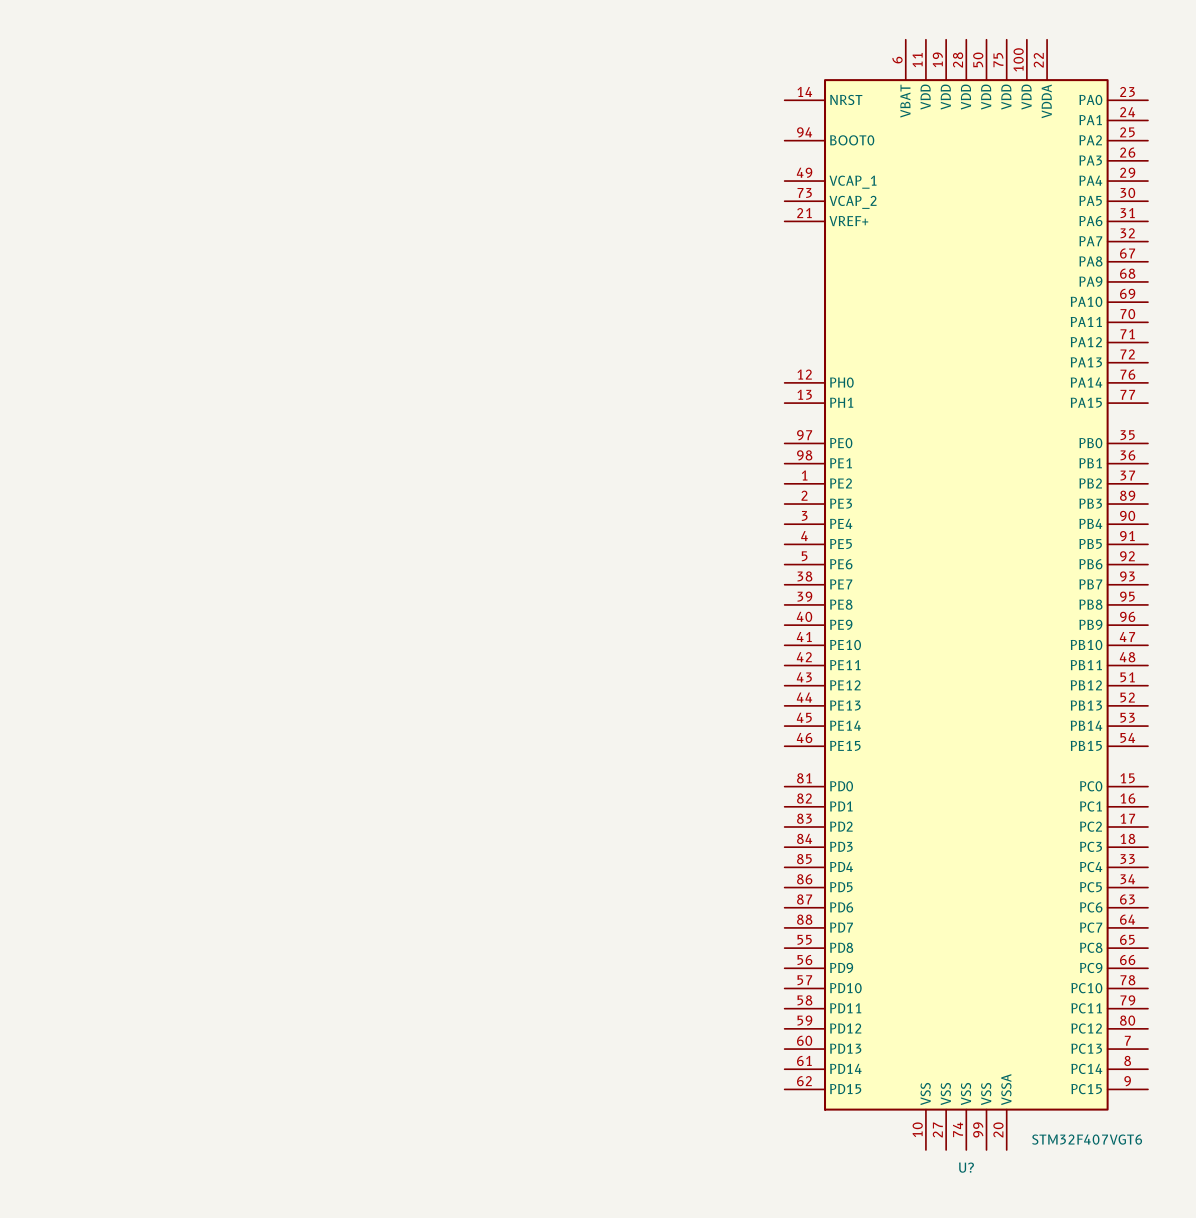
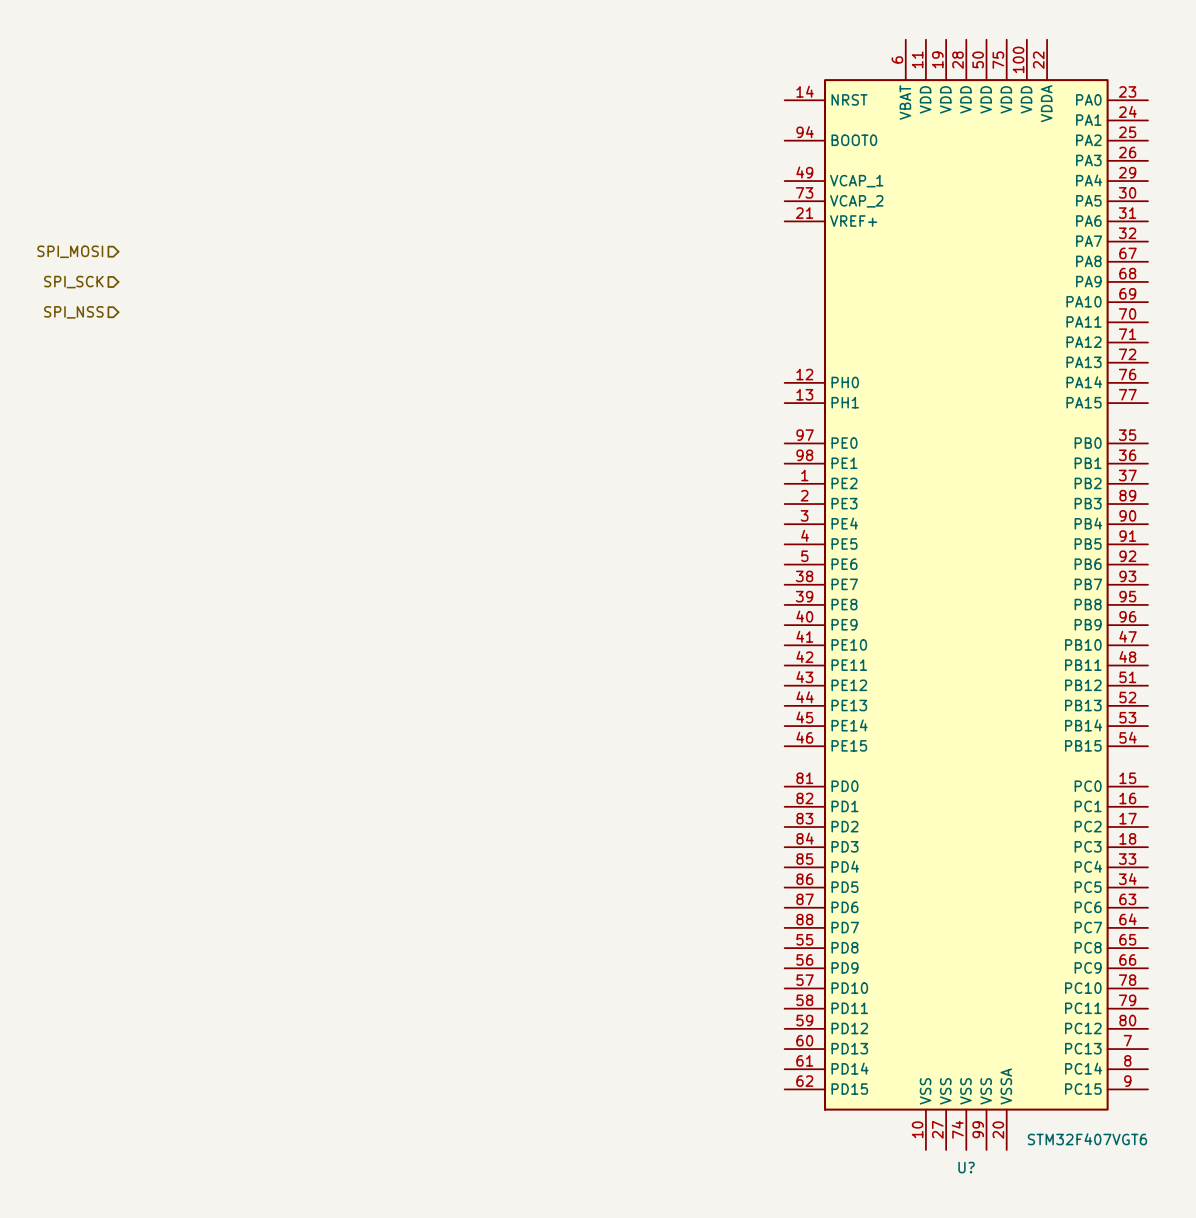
hierarchical label: none -> SPI_MOSI (70, 251)
hierarchical label: none -> SPI_SCK (73, 282)
hierarchical label: none -> SPI_NSS (73, 312)

